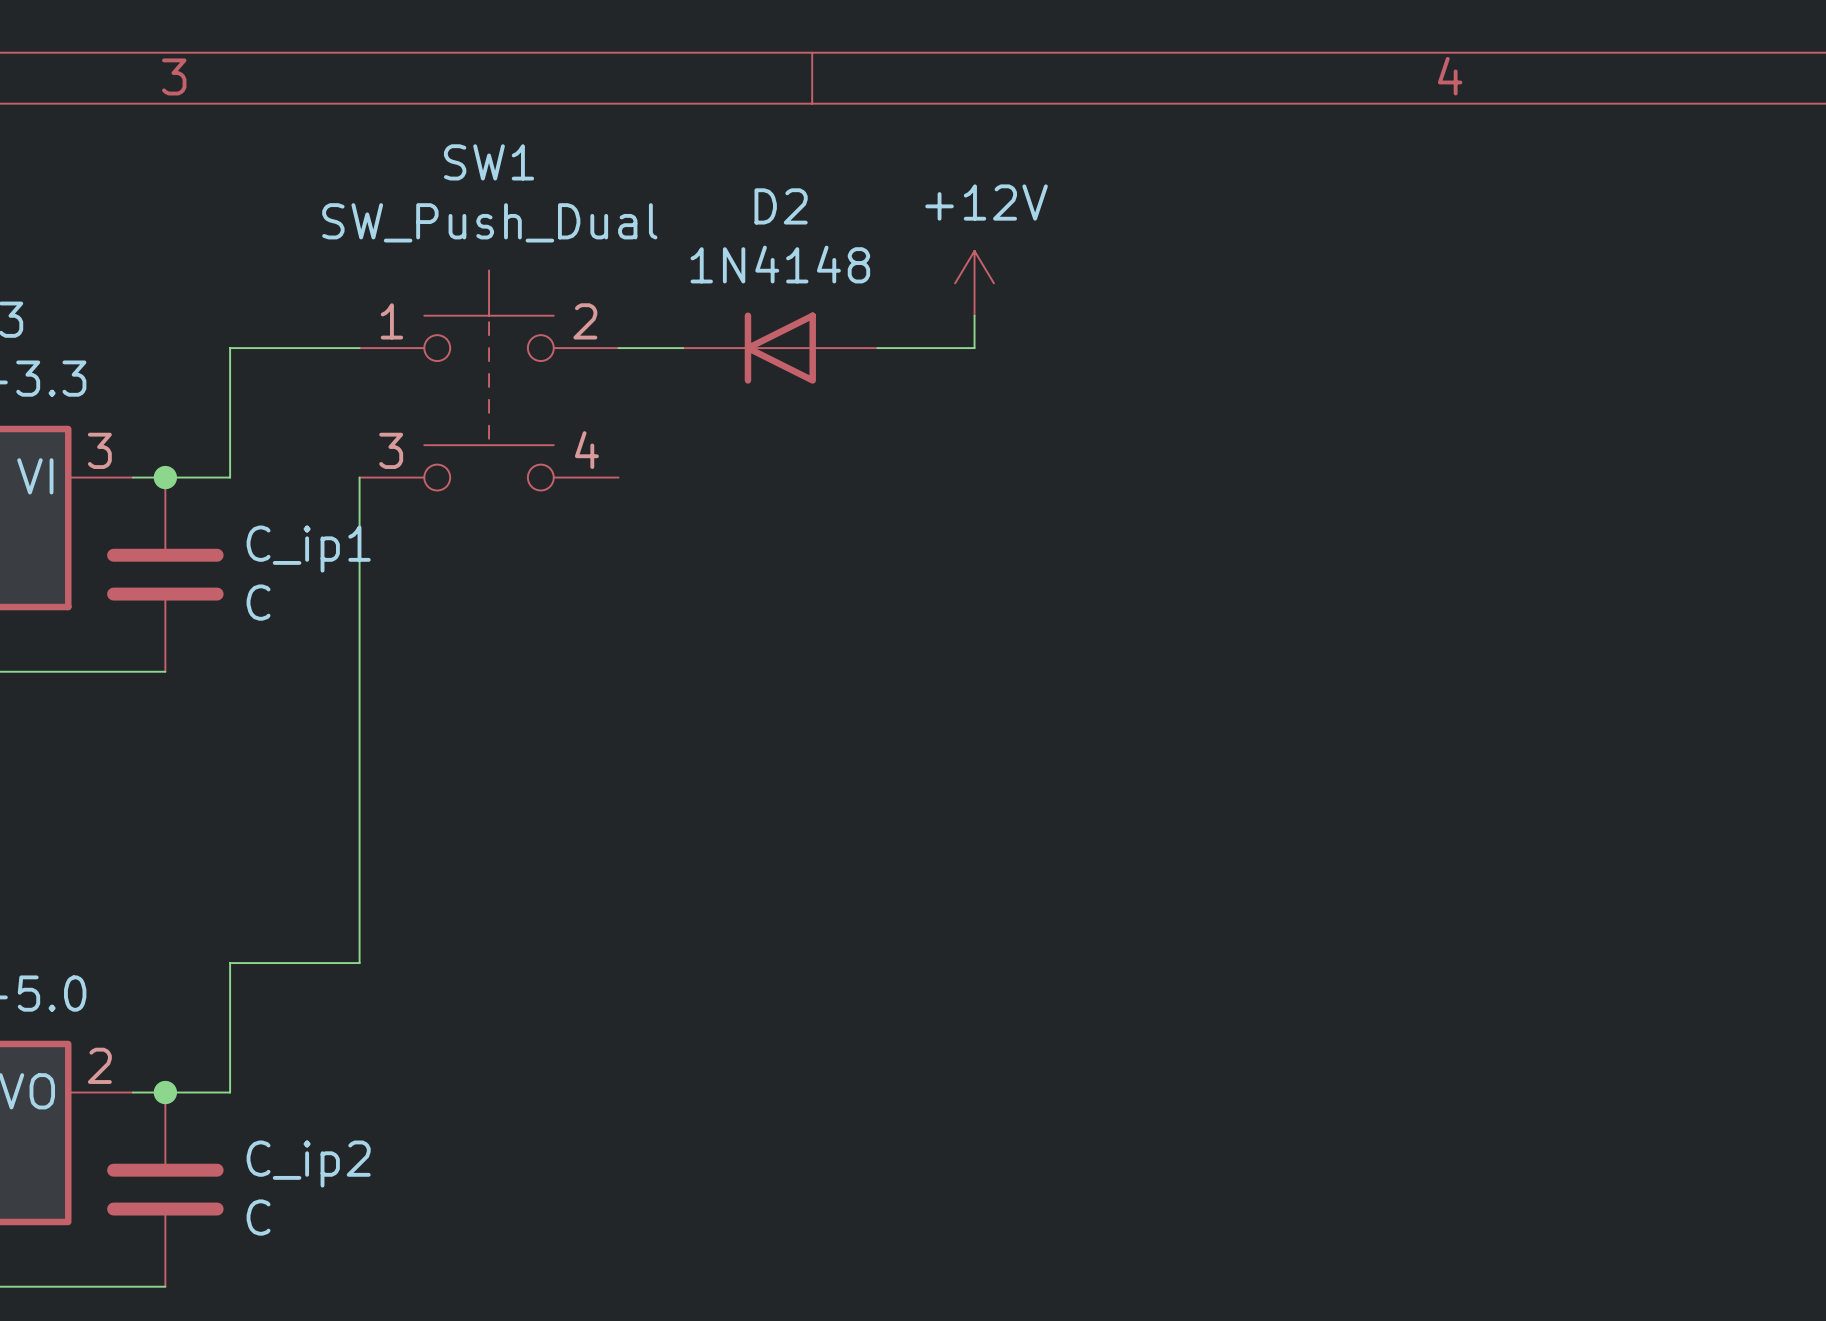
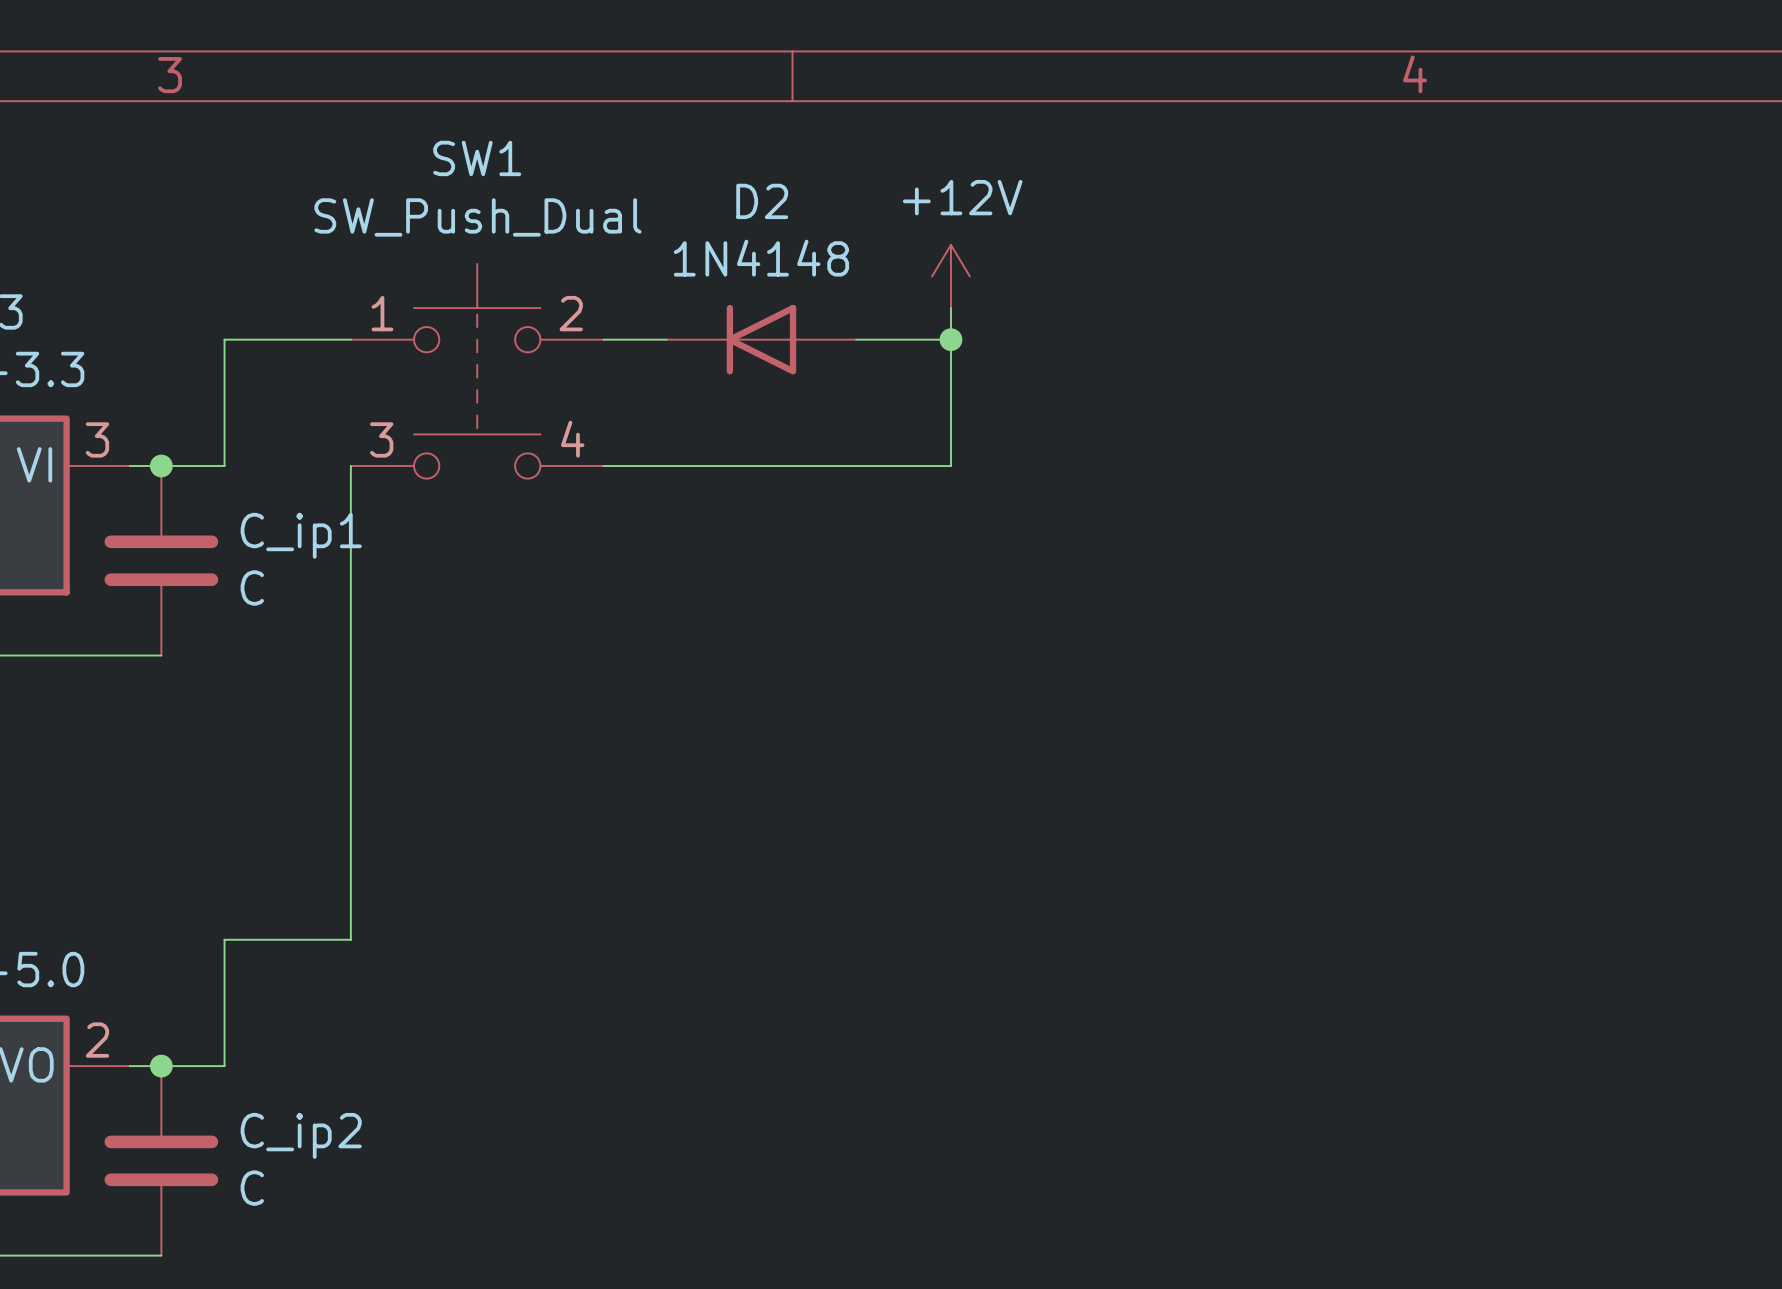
wire: none -> (950, 339) (950, 466) (603, 466)
junction: none -> (950, 339)

